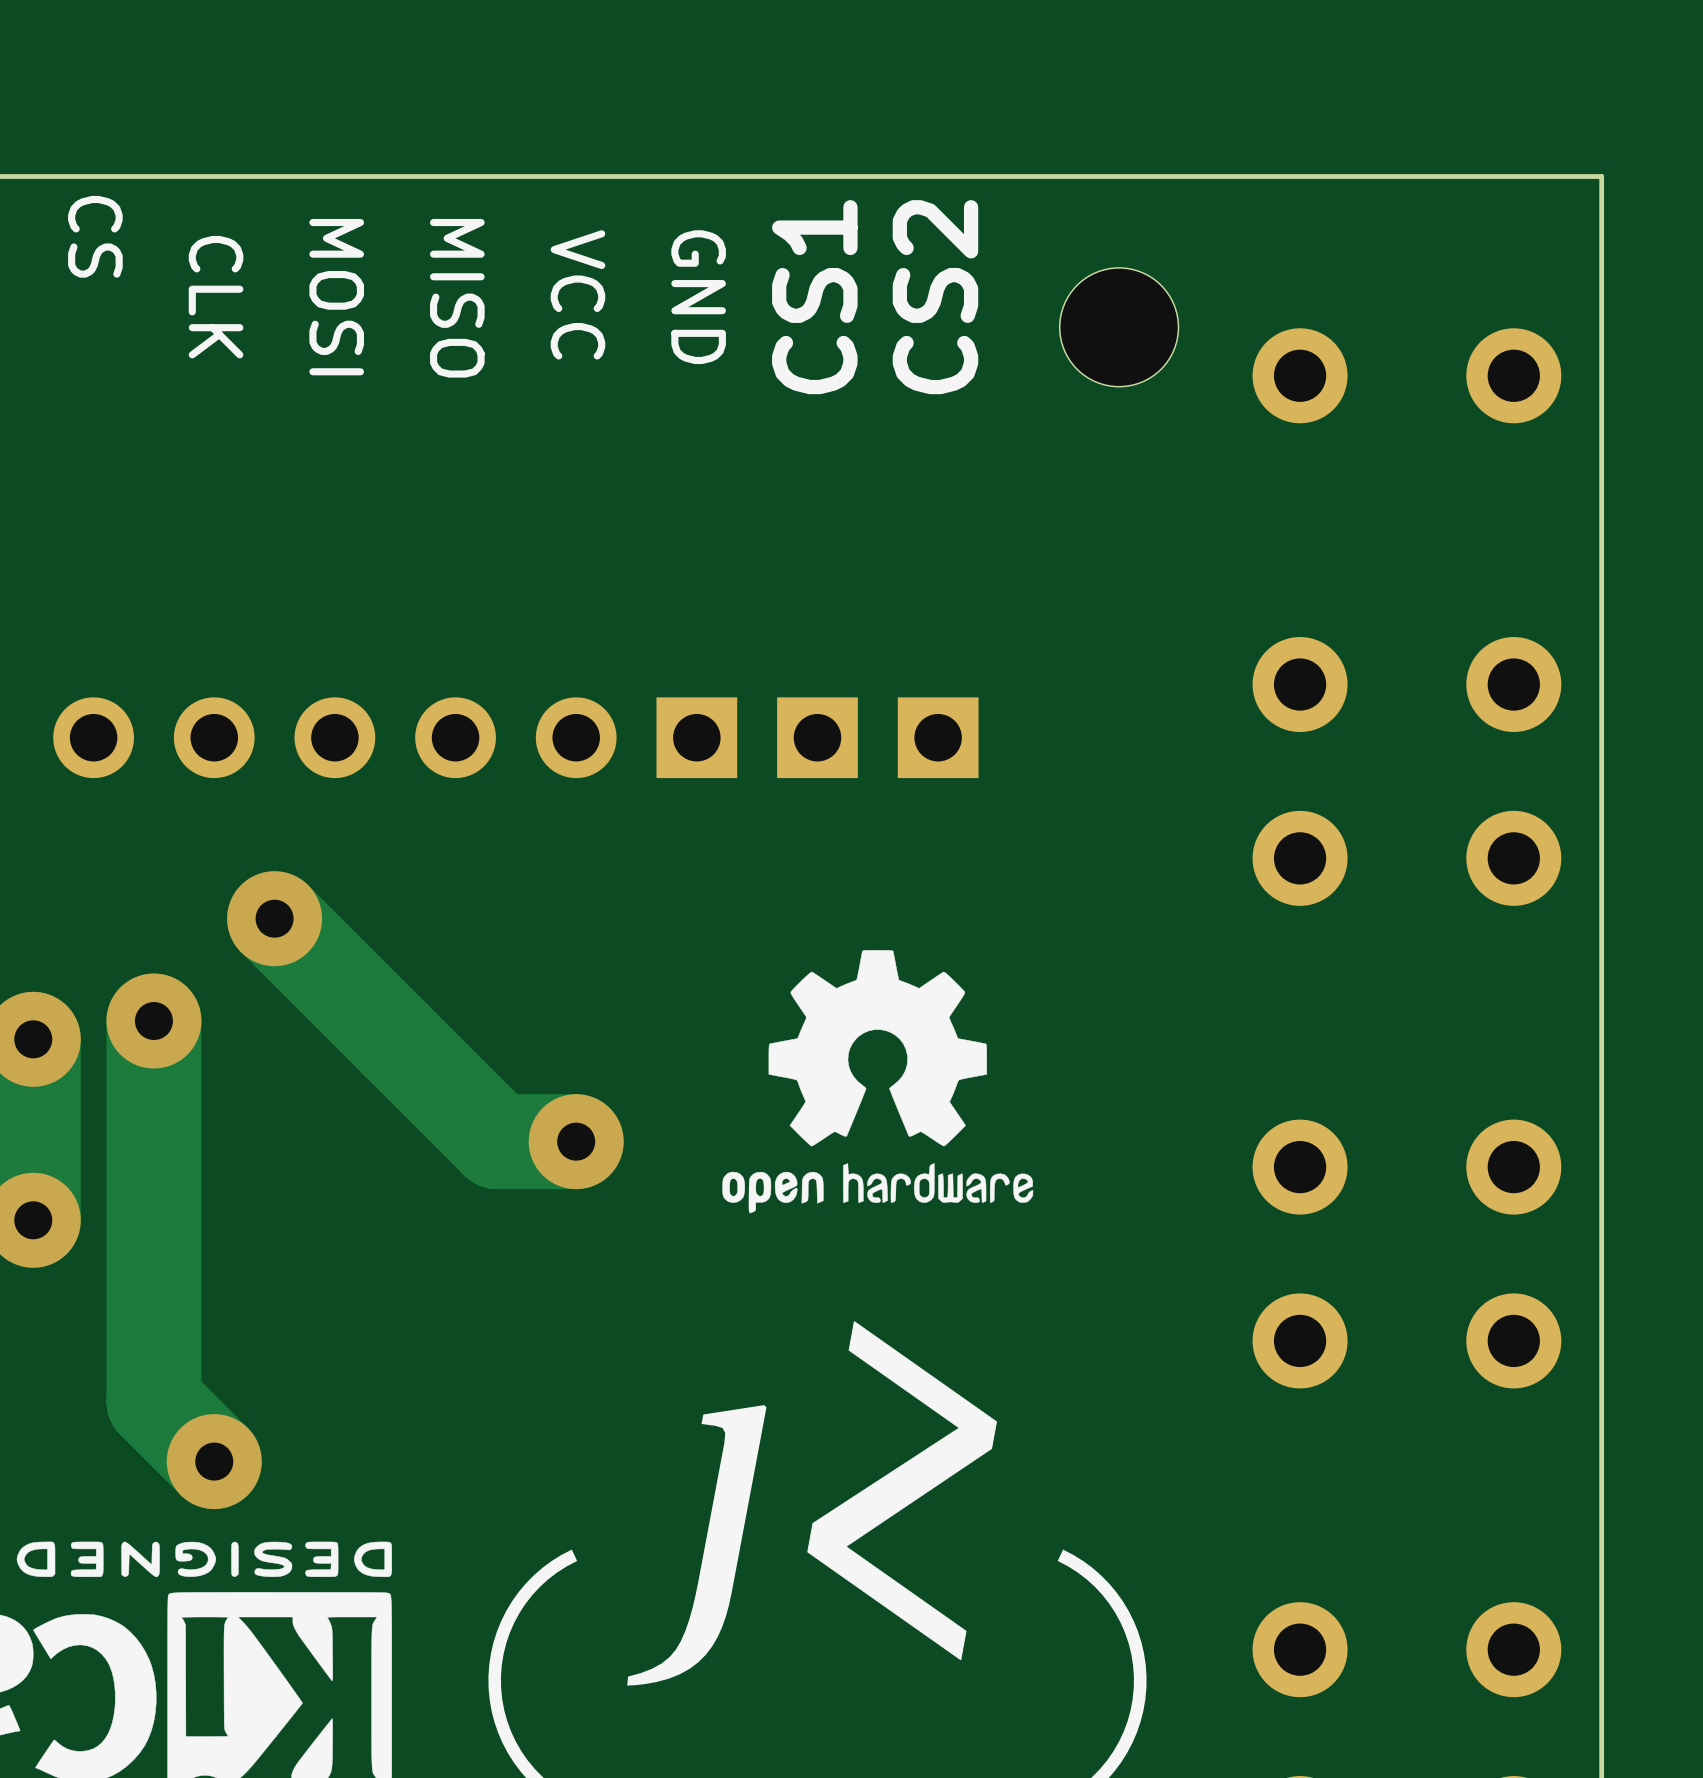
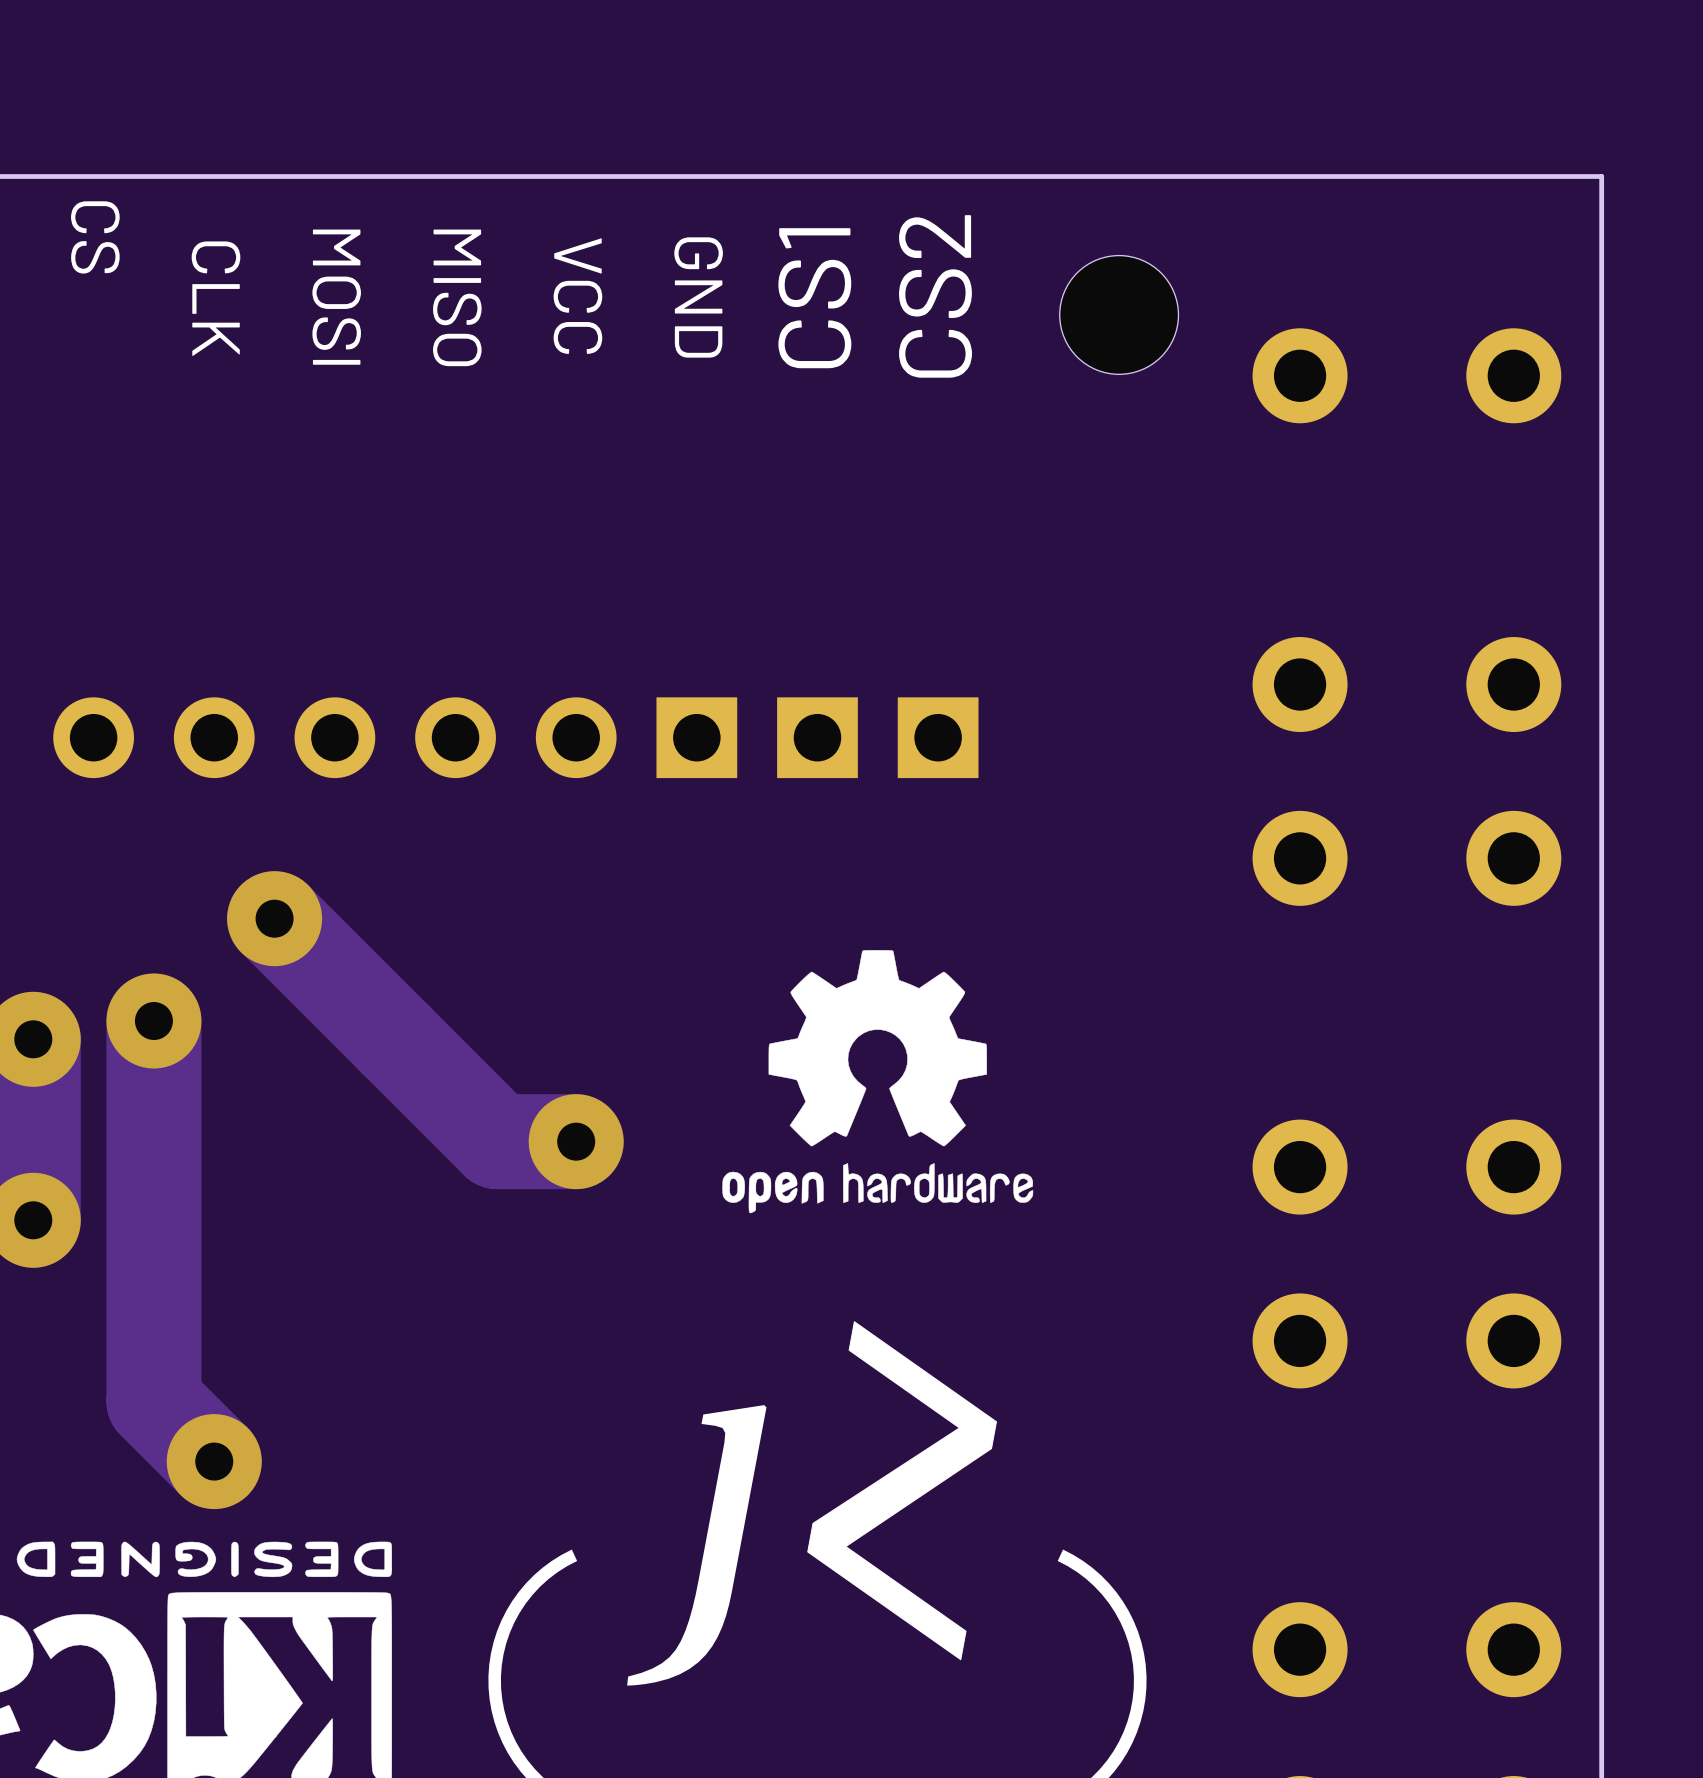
part position: (1119, 327) -> (1119, 314)

